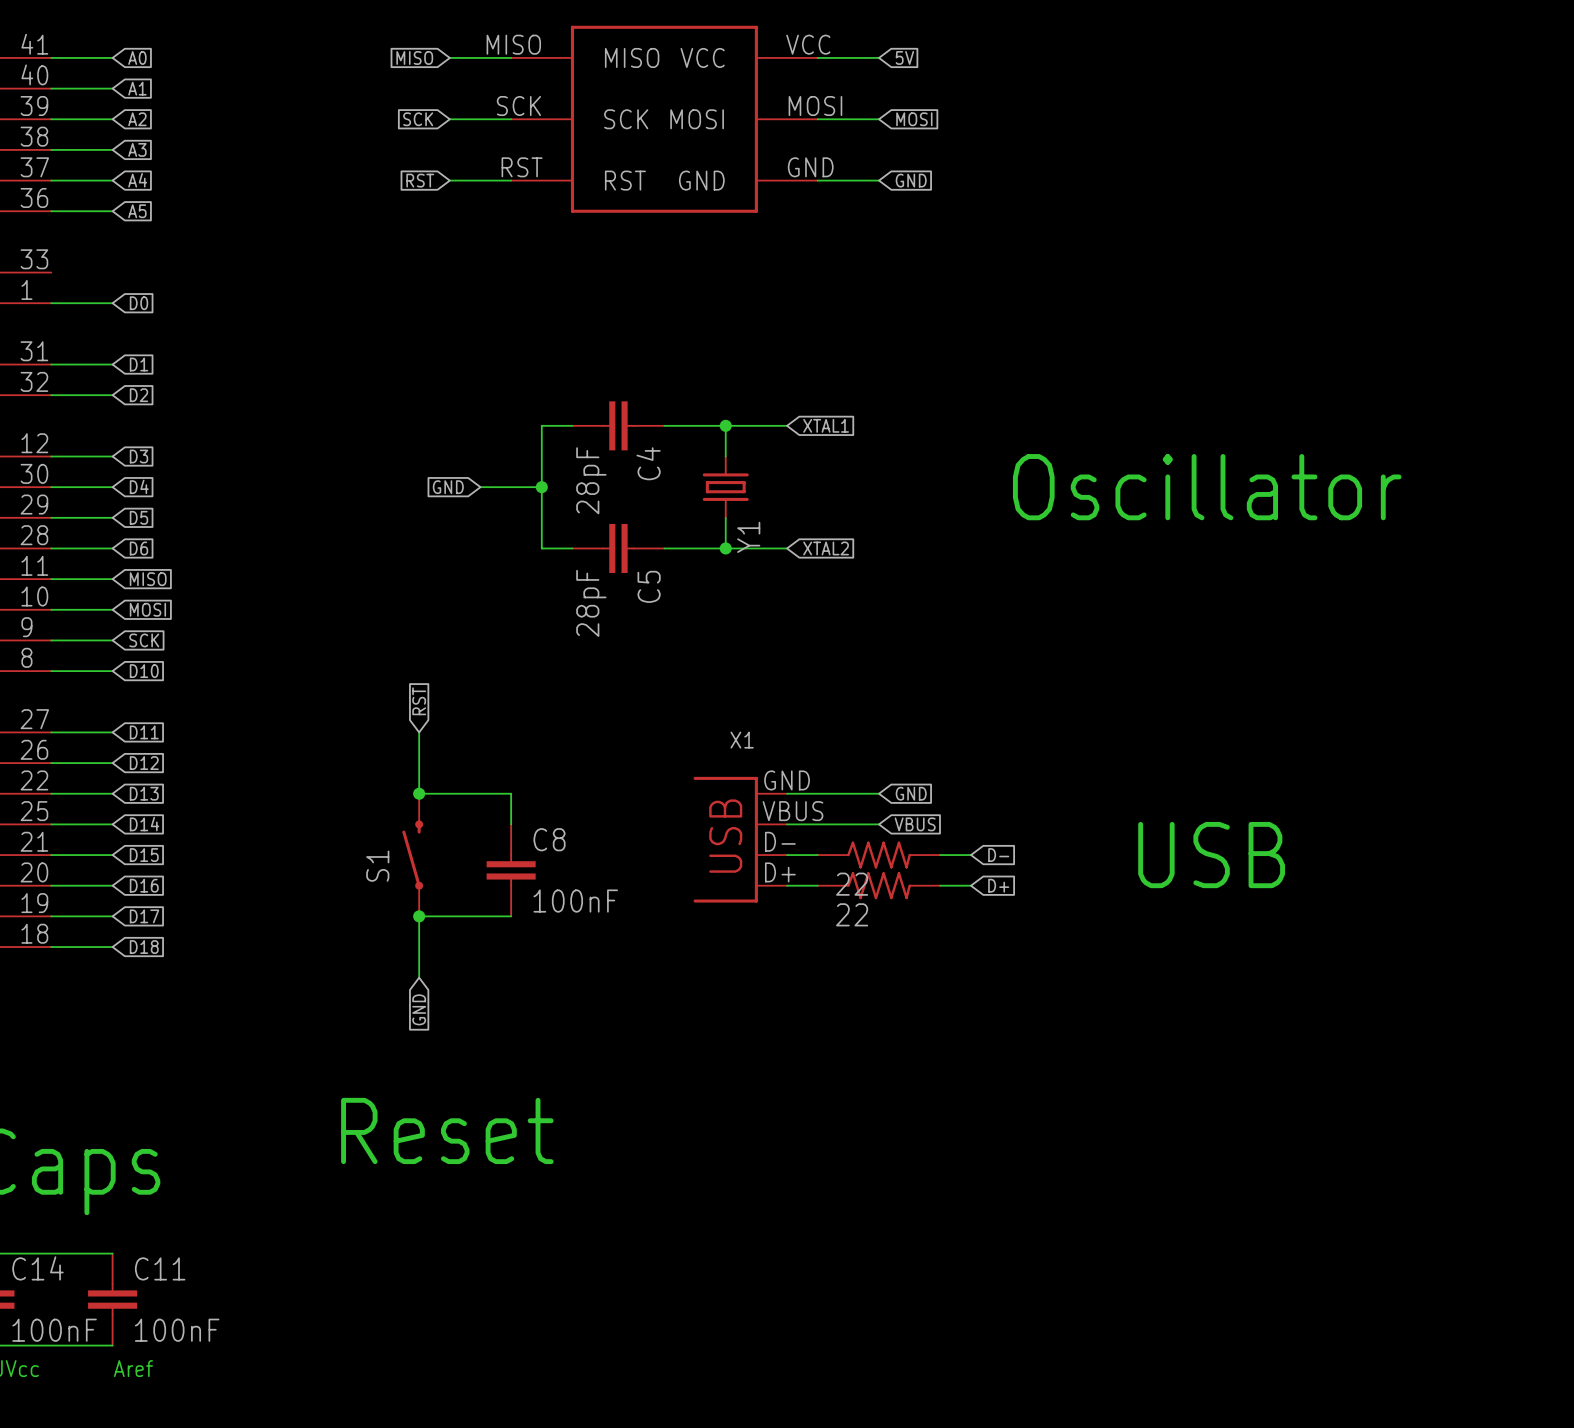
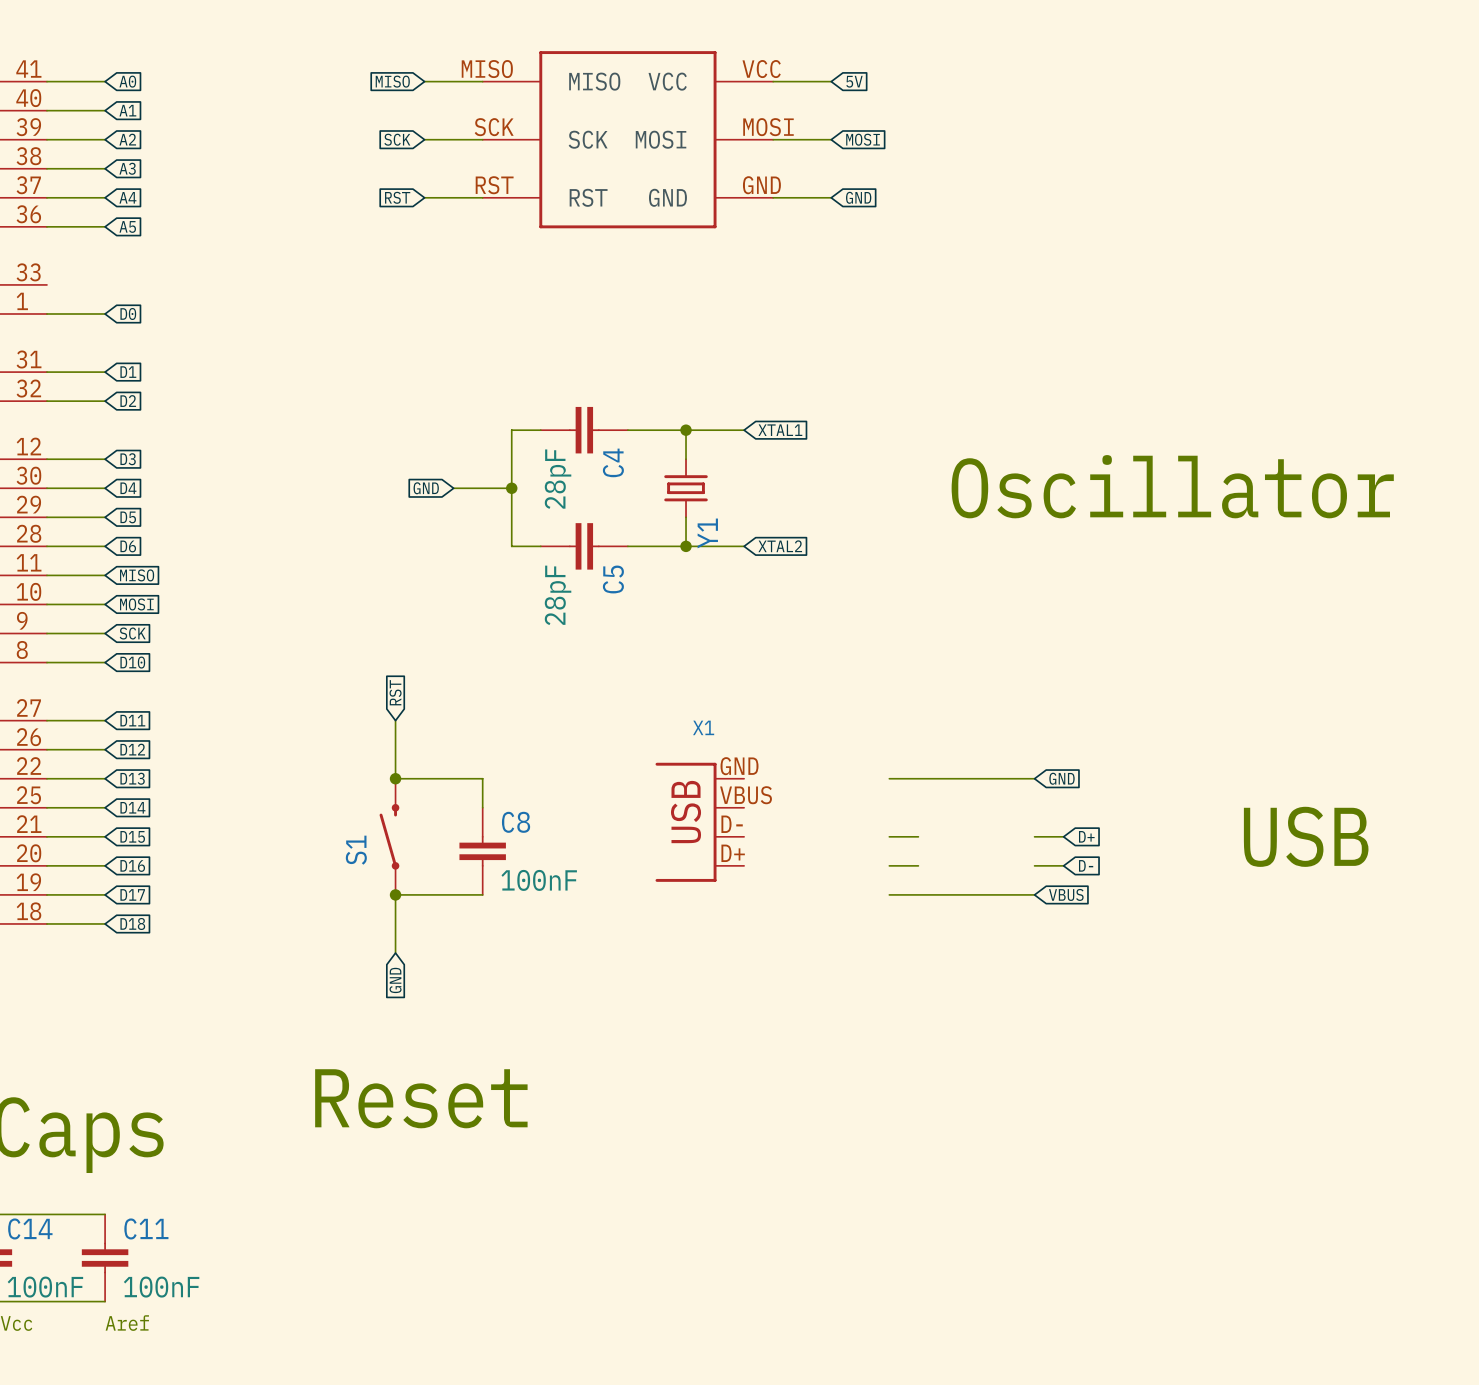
wire: (787, 793) (879, 793) -> none
global label position: GND (911, 793) -> GND (1062, 778)
wire: none -> (889, 778) (1034, 778)
wire: (787, 824) (879, 824) -> none
global label position: VBUS (915, 824) -> VBUS (1066, 894)
wire: (787, 855) (817, 855) -> none
part: 22 (879, 855) -> none
global label position: D- (998, 855) -> D- (1086, 865)
wire: none -> (1034, 836) (1063, 836)
text position: USB (1211, 855) -> USB (1306, 836)
wire: (787, 885) (817, 885) -> none
part: 22 (879, 885) -> none
global label position: D+ (998, 885) -> D+ (1086, 836)
wire: none -> (1034, 865) (1063, 865)
wire: none -> (889, 894) (1034, 894)

